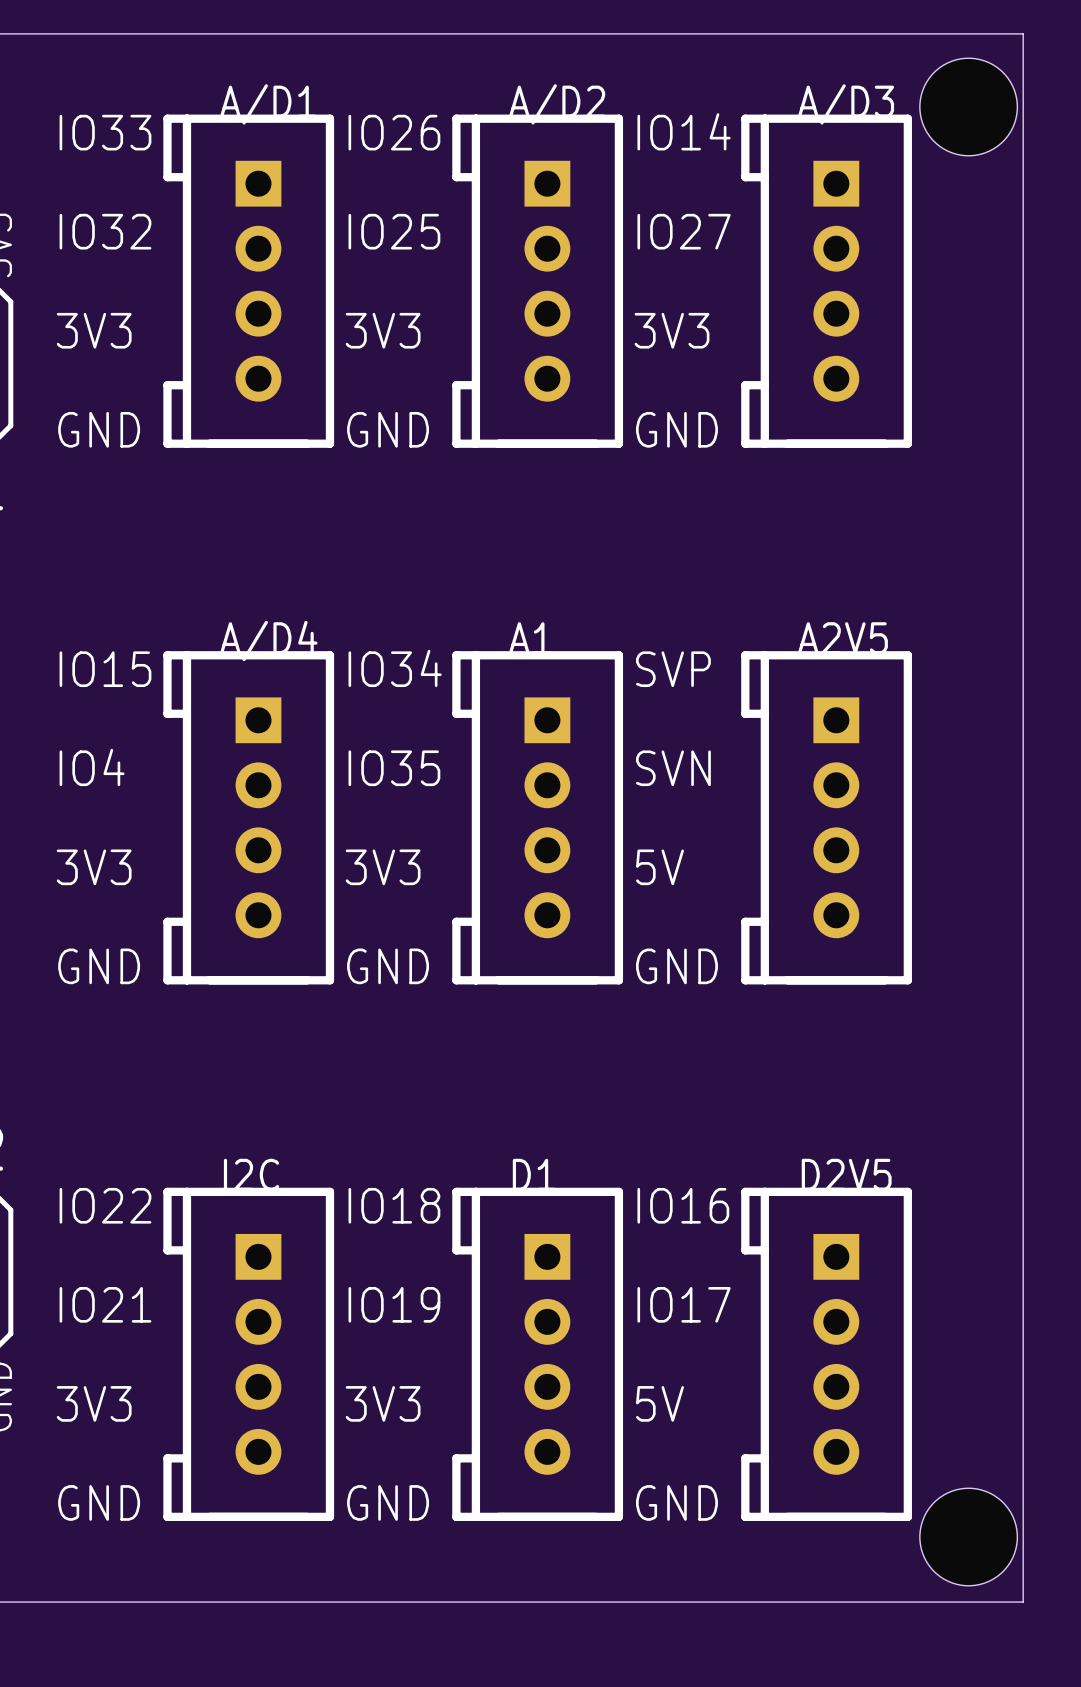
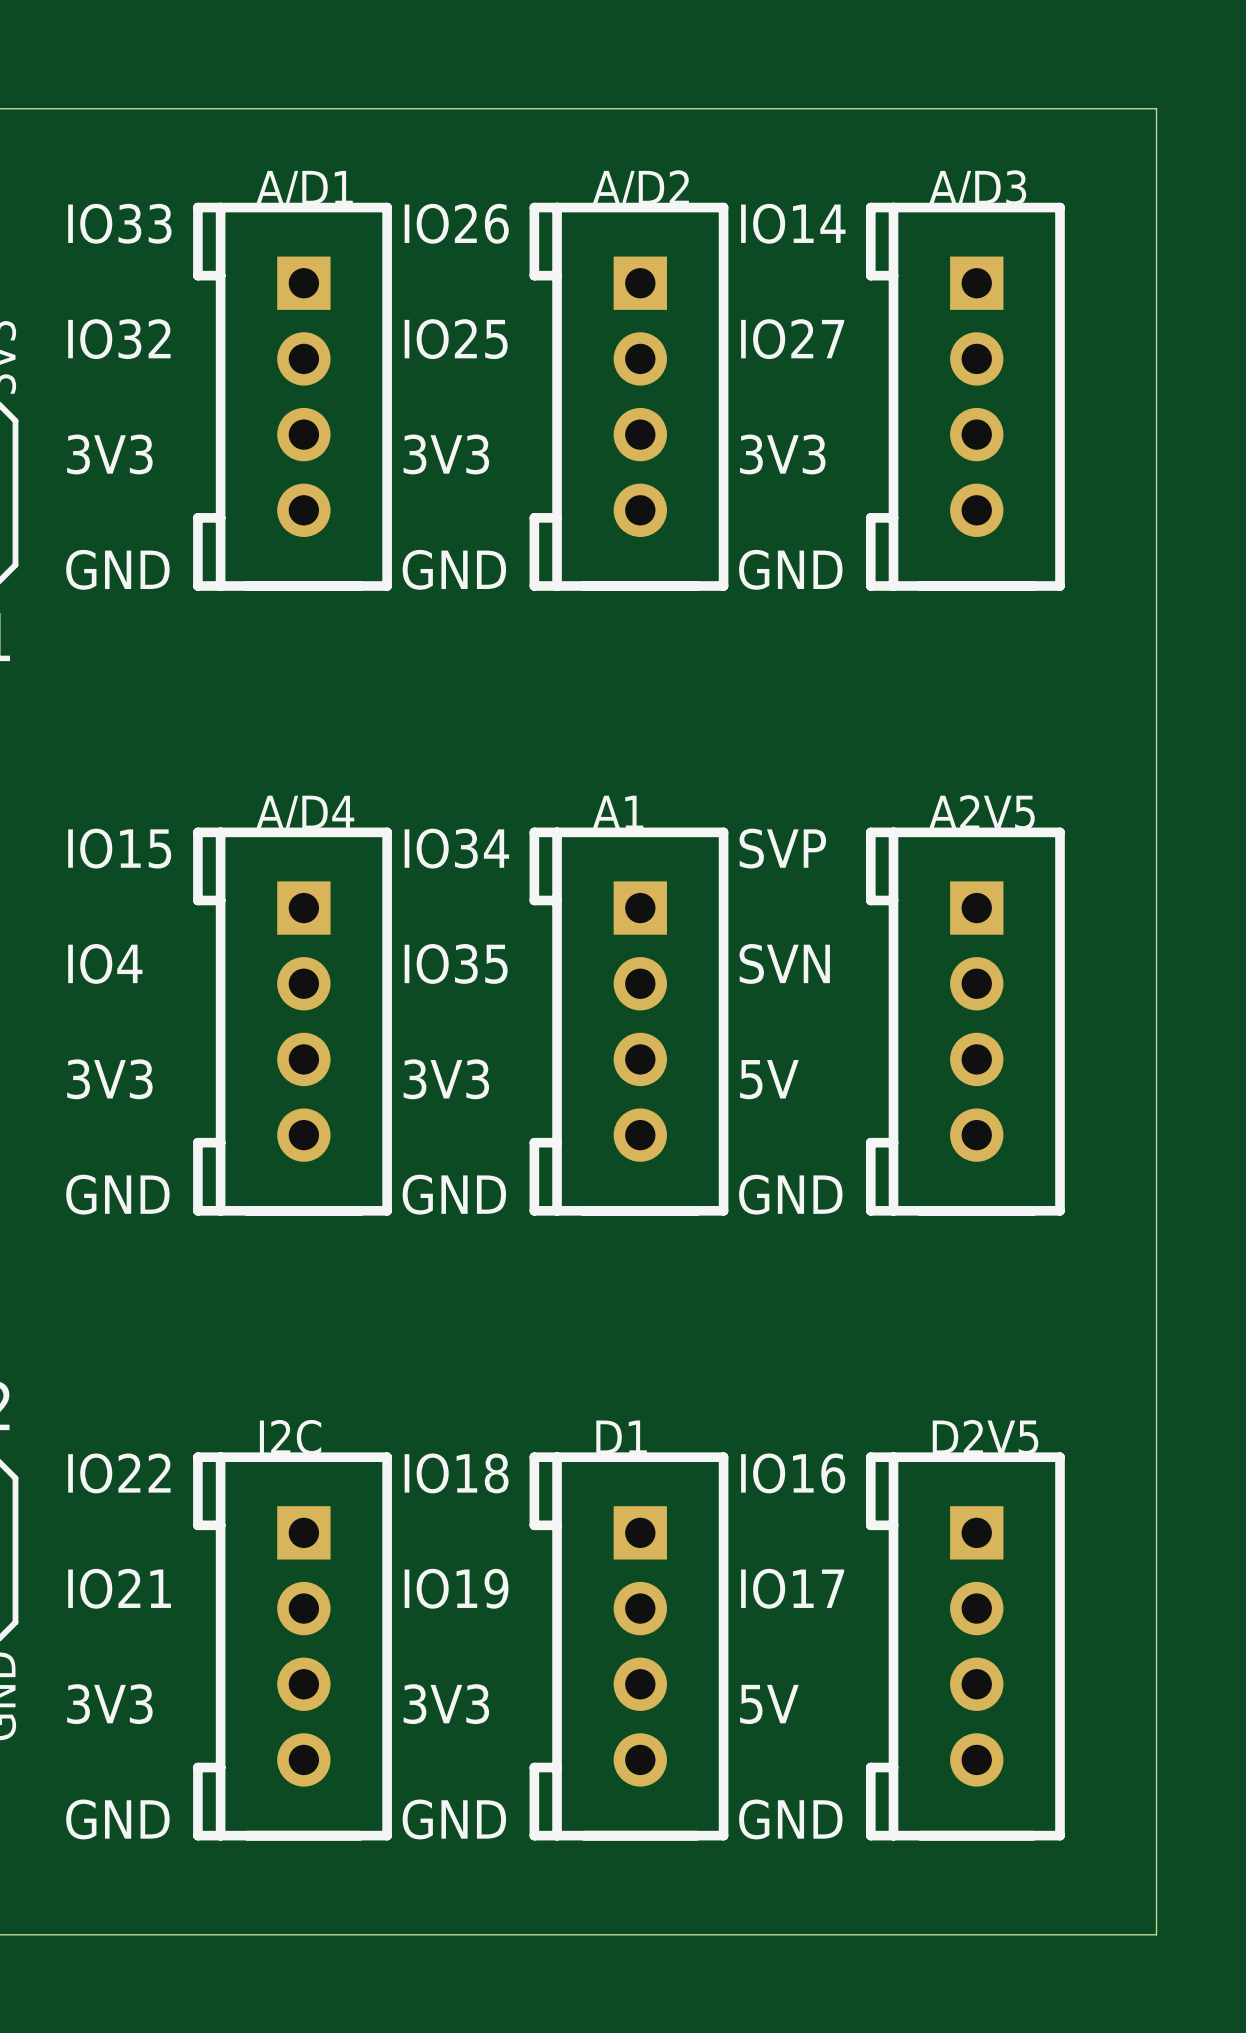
board edge: (990, 33) (1023, 33) (1023, 1602) (990, 1602) -> (1156, 108) (1156, 1934)
hole: (968, 107) -> none
hole: (968, 1537) -> none

